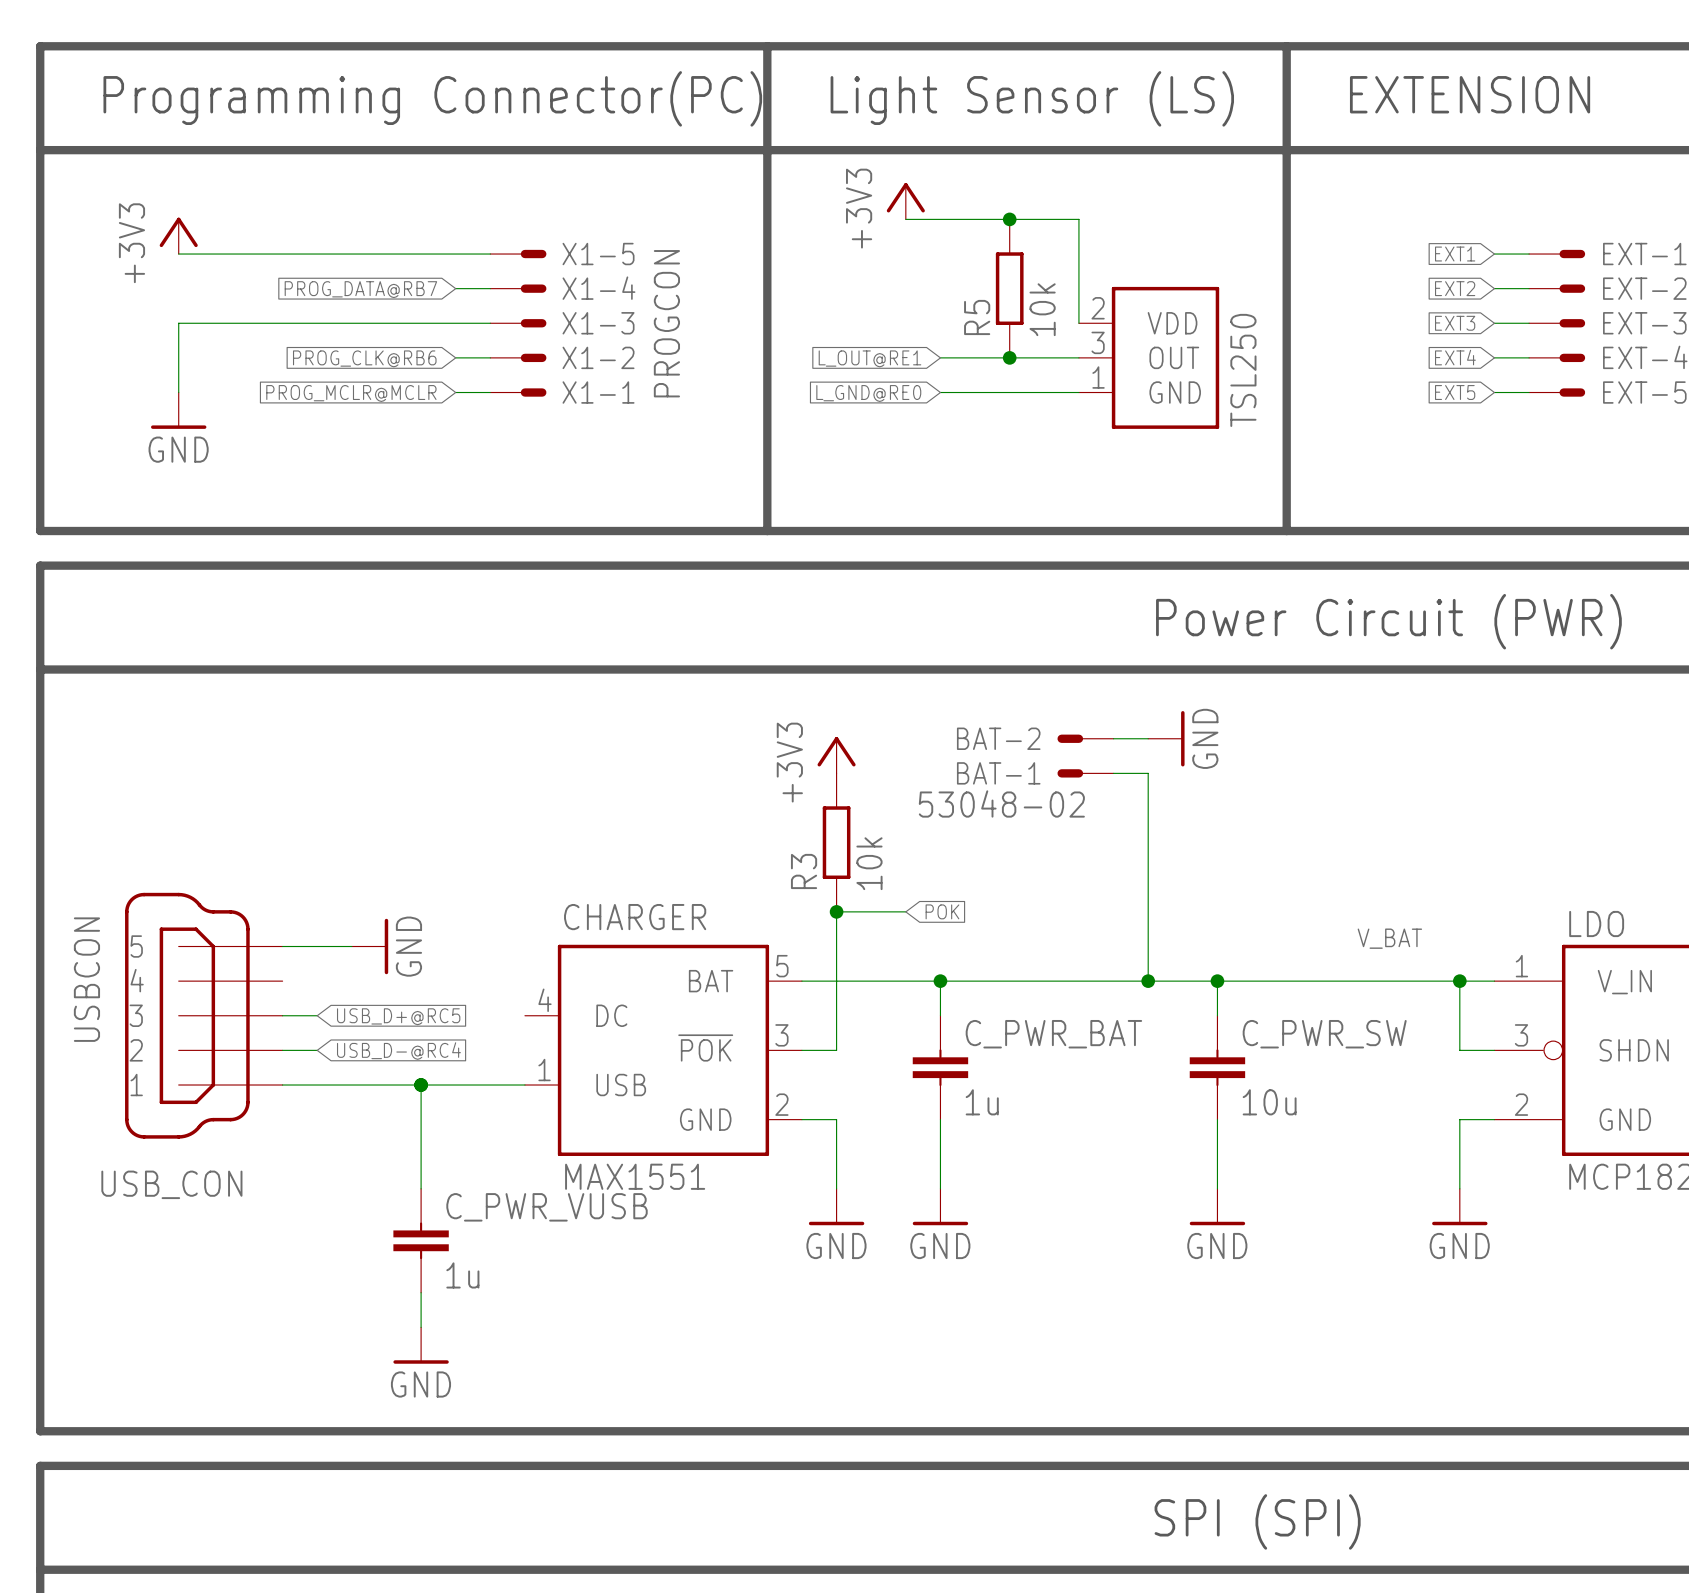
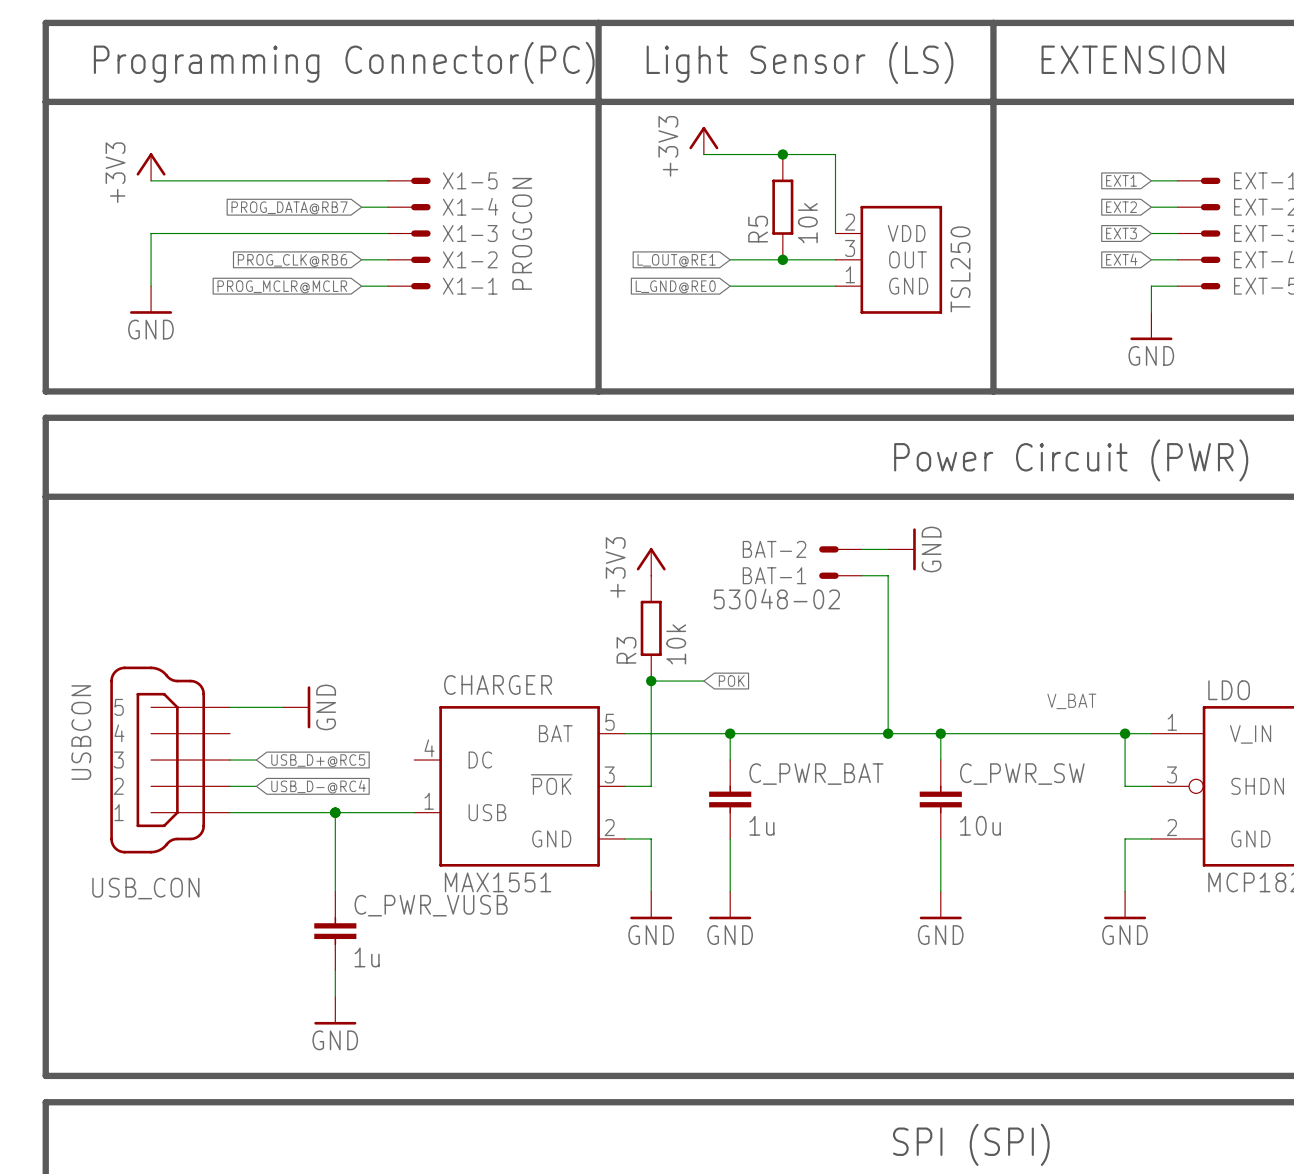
global label: EXT5 (1455, 392) -> none
wire: none -> (1151, 286) (1151, 312)
power symbol: none -> GND (1151, 326)

